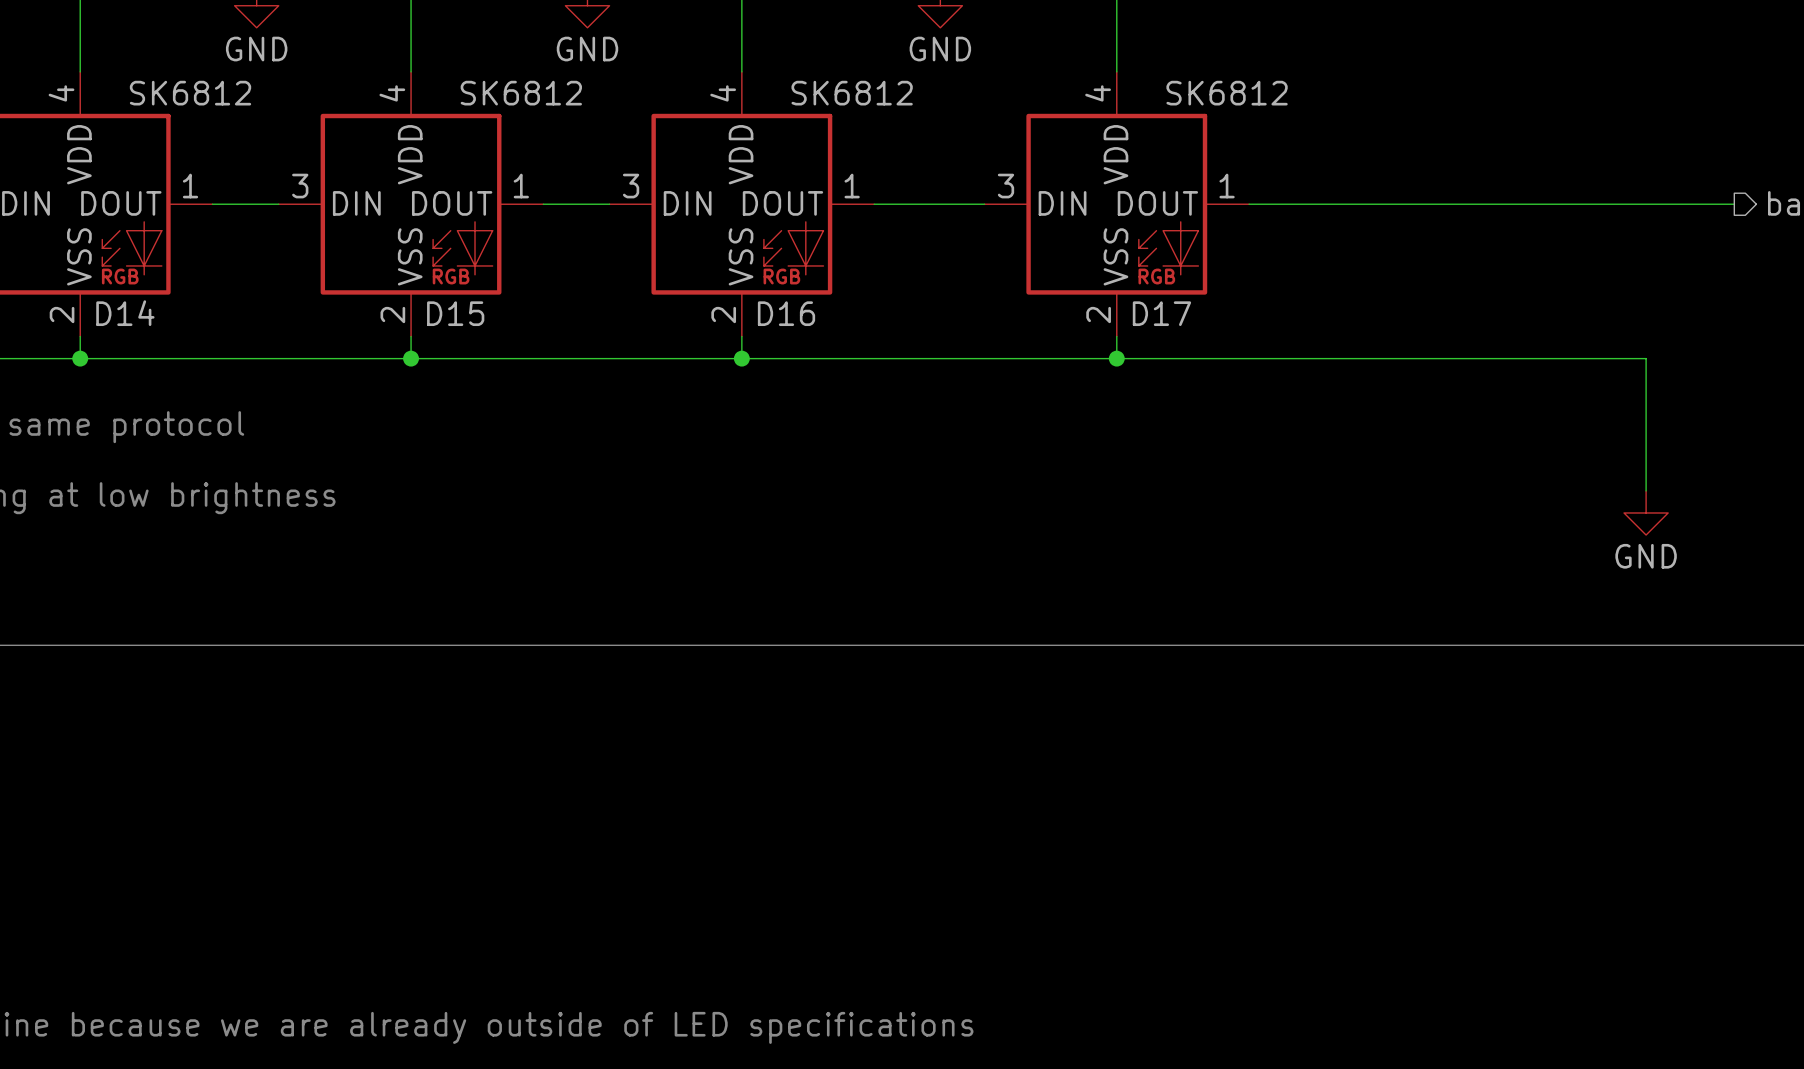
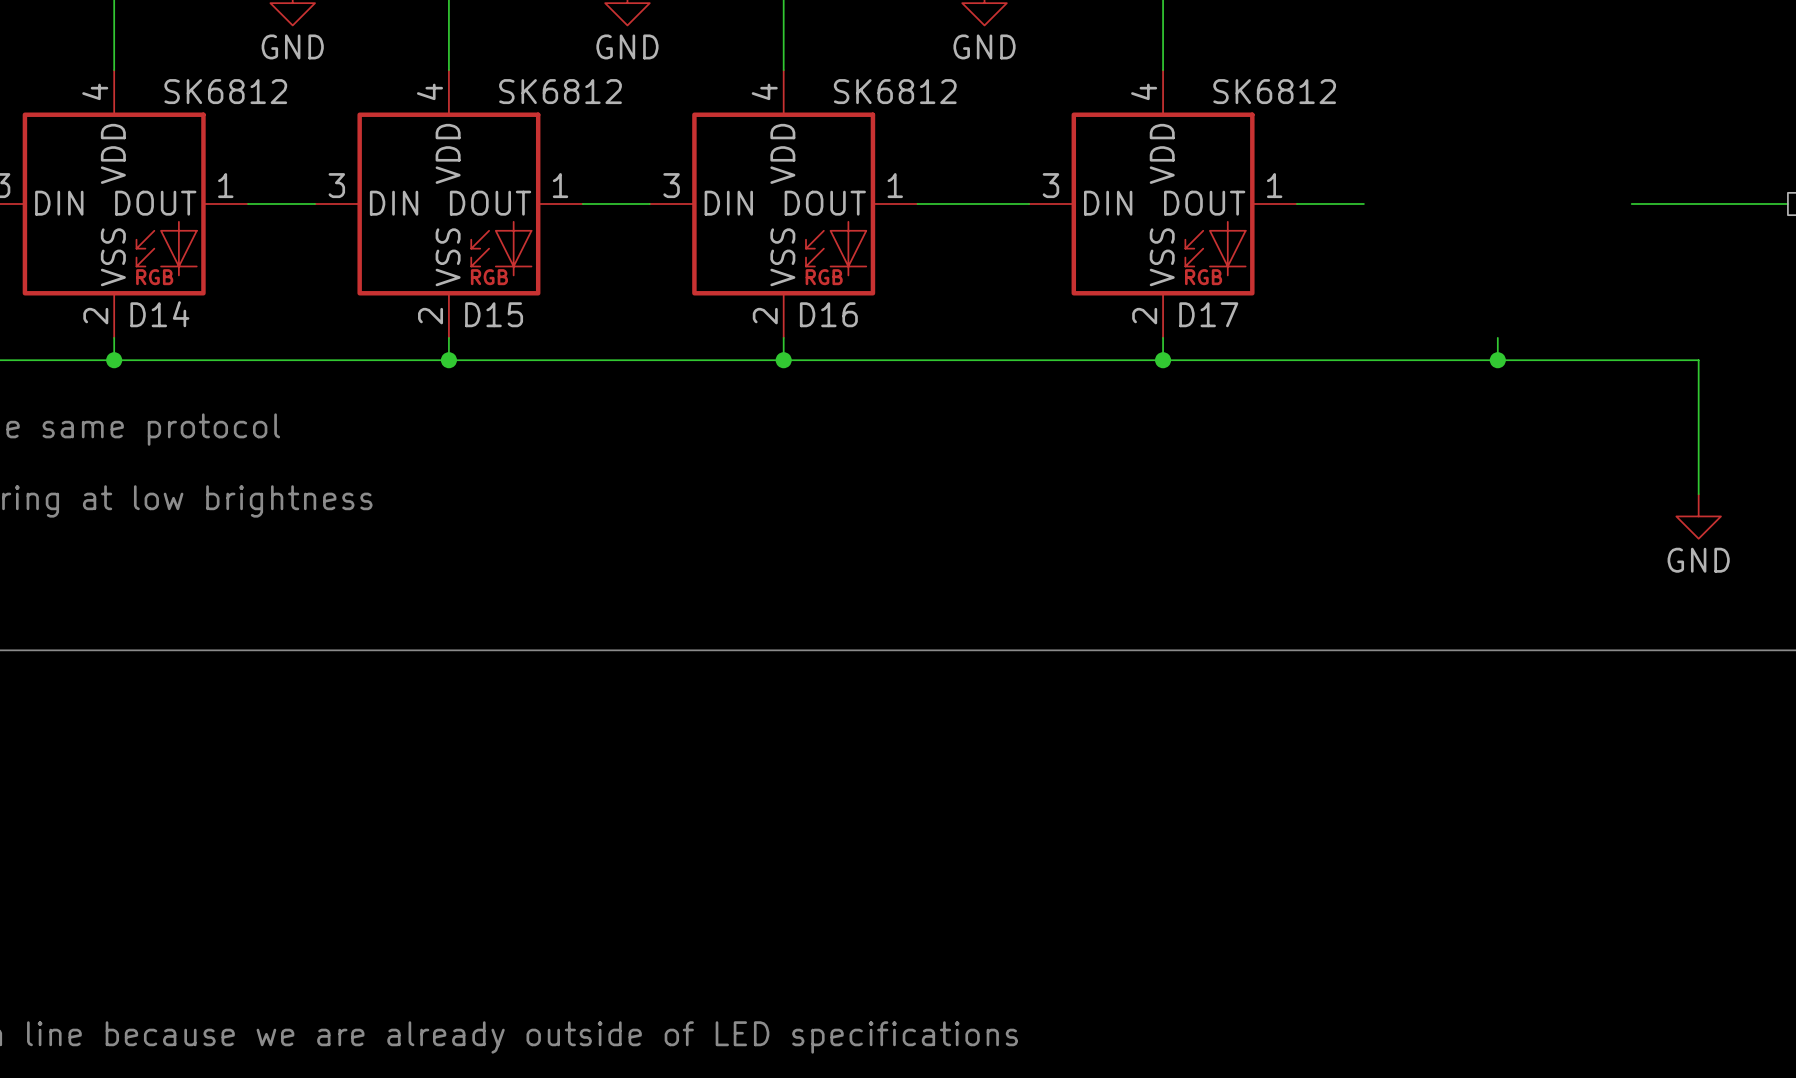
wire: (1315, 204) (1579, 204) -> none
wire: none -> (1497, 337) (1497, 360)
junction: none -> (1497, 360)

